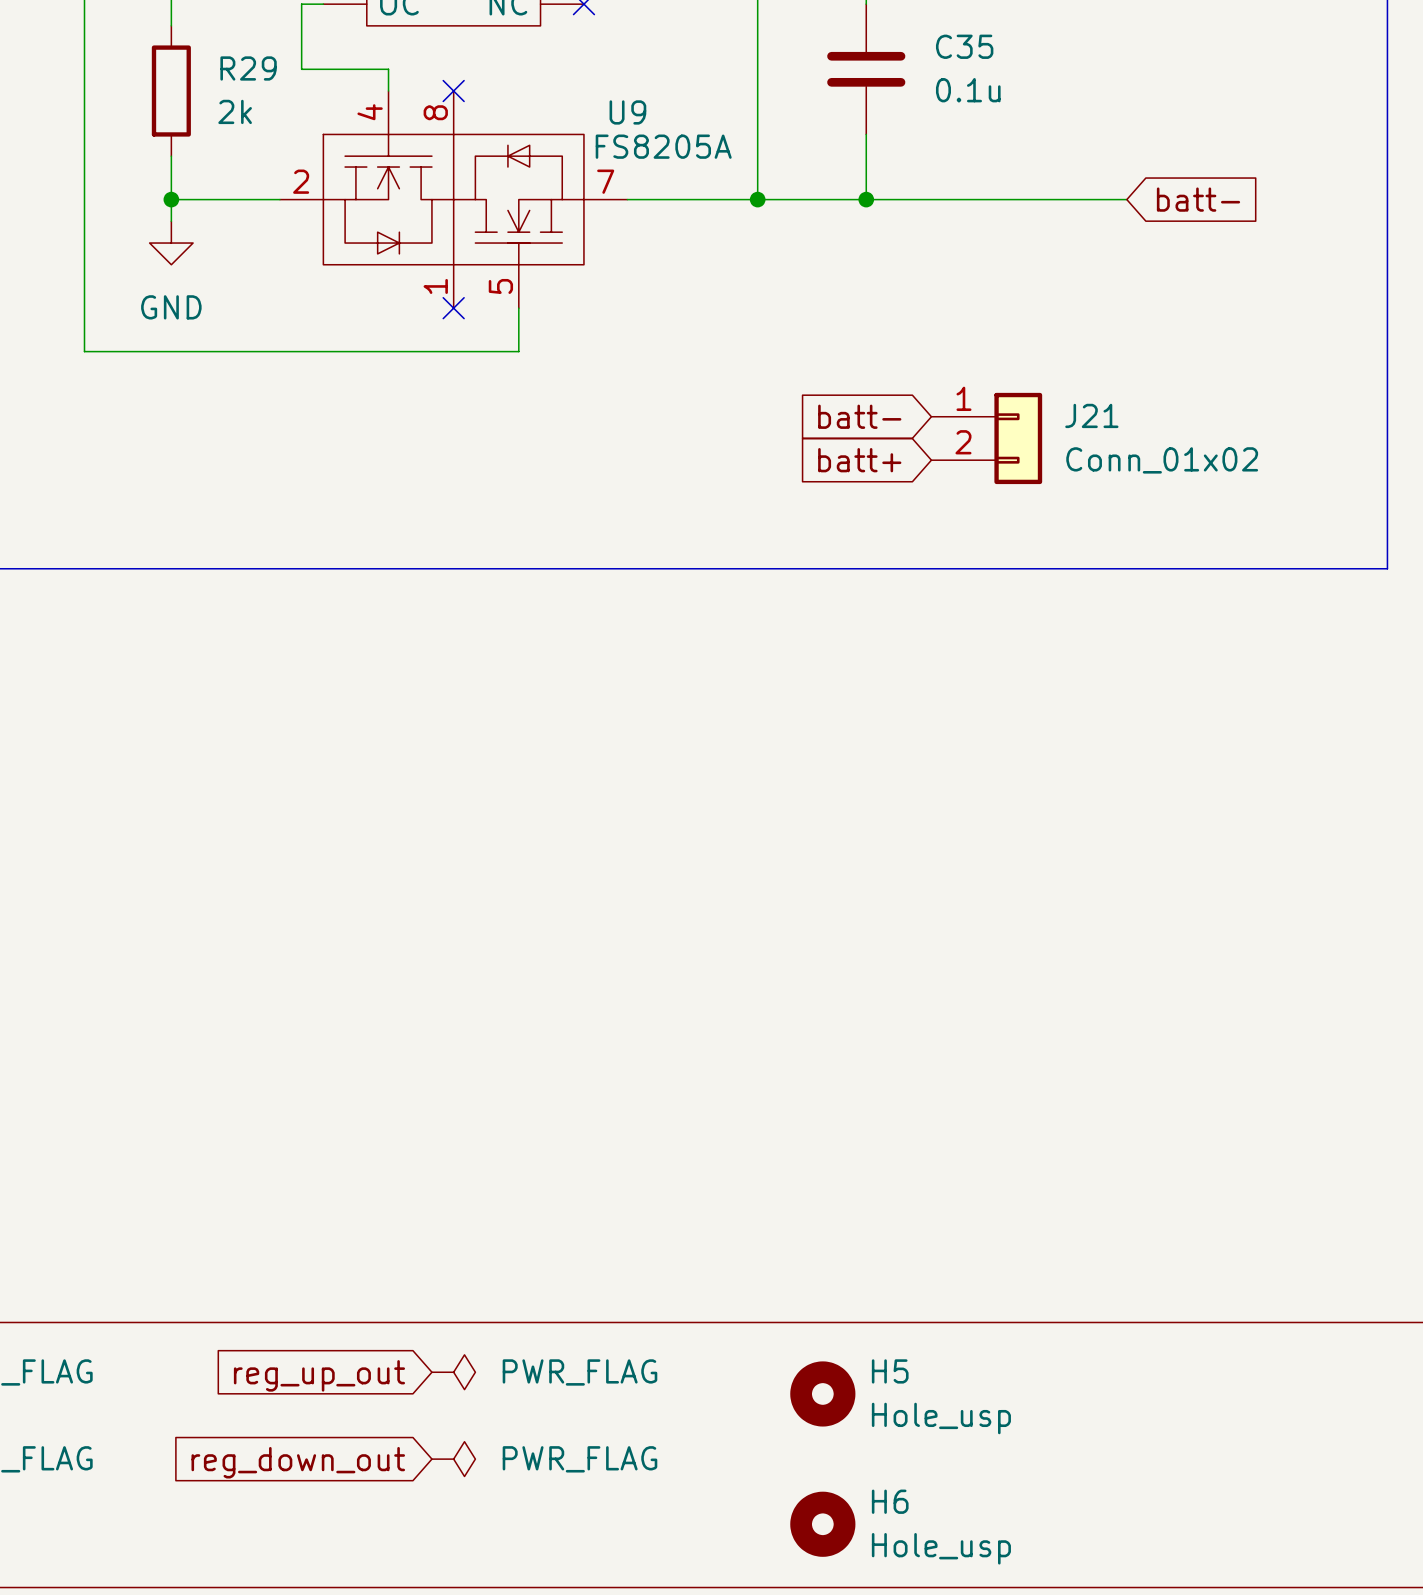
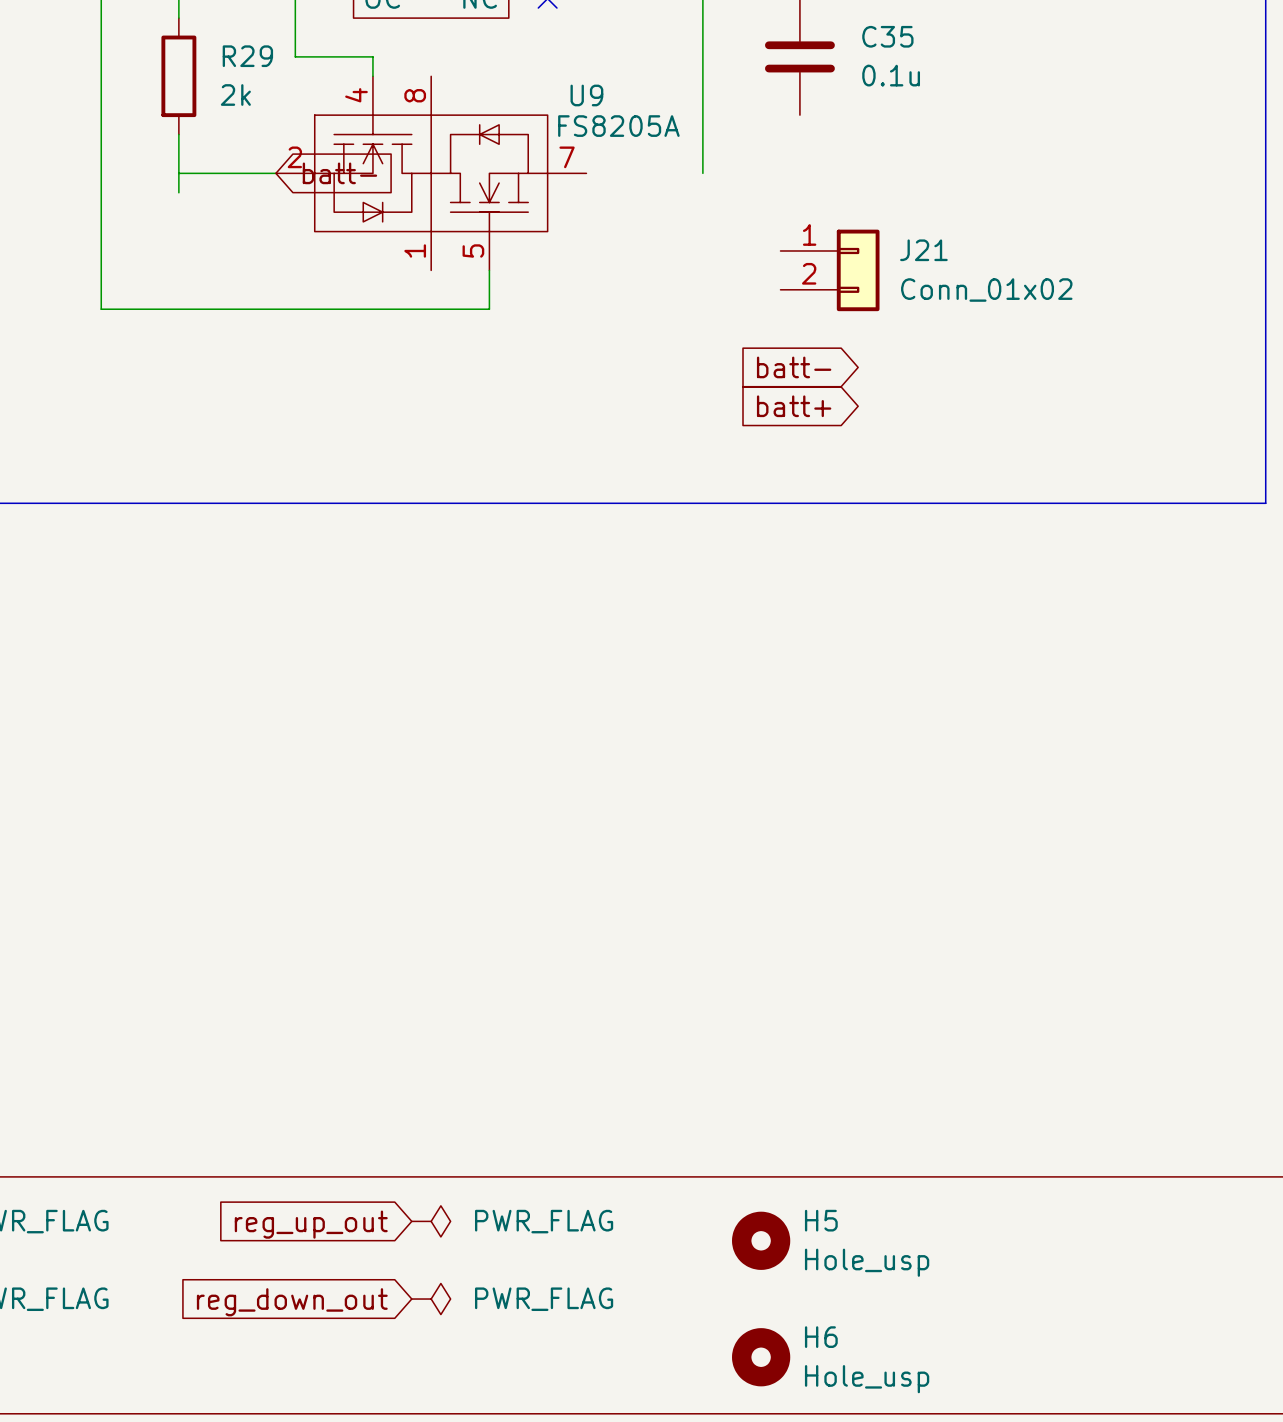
no-connect mark: (453, 91) -> none
wire: (866, 134) (866, 199) -> none
junction: (171, 199) -> none
global label: none -> batt- (339, 173)
wire: (627, 199) (1126, 199) -> none
junction: (757, 199) -> none
junction: (866, 199) -> none
global label: batt- (1198, 199) -> none
power symbol: GND (171, 243) -> none
no-connect mark: (453, 308) -> none
J21 position: (986, 438) -> (830, 270)

